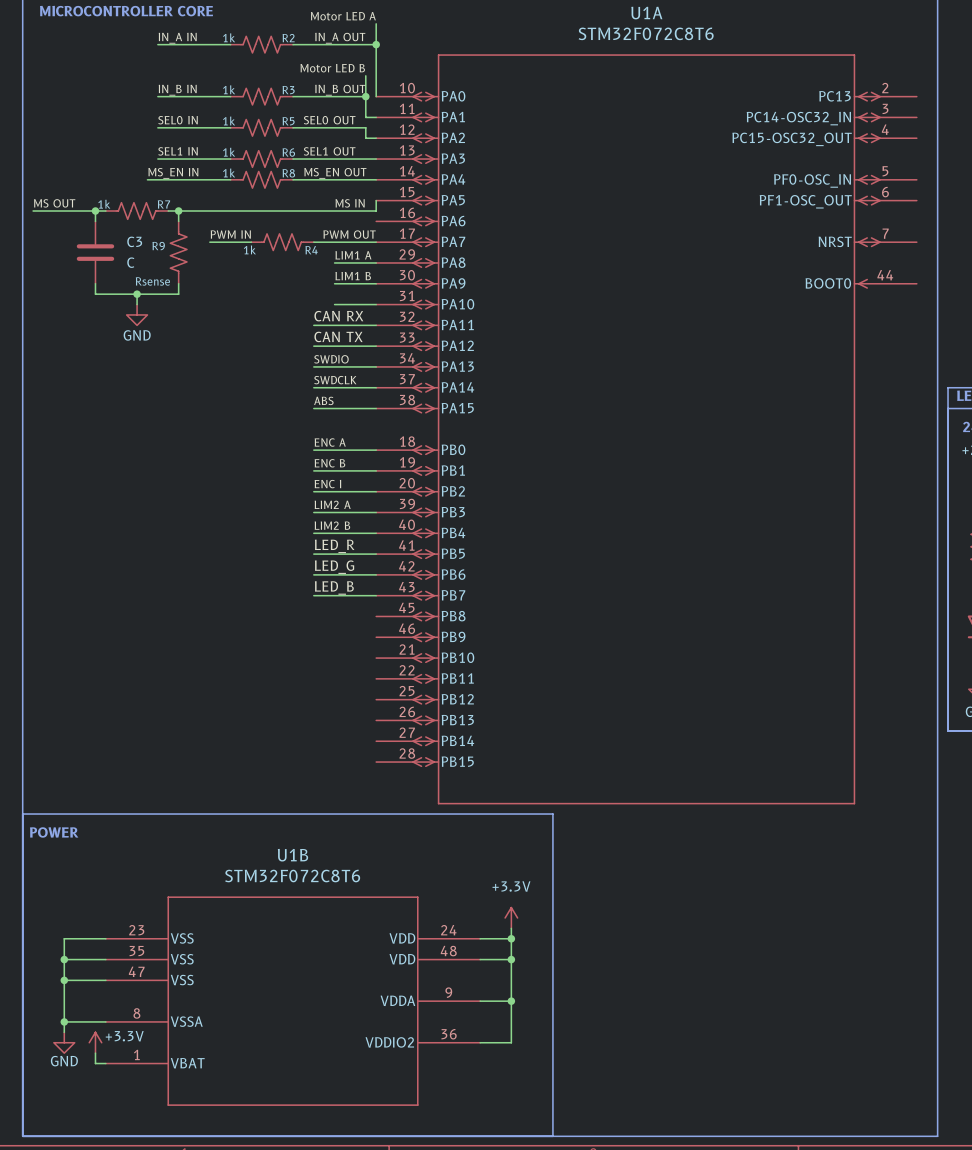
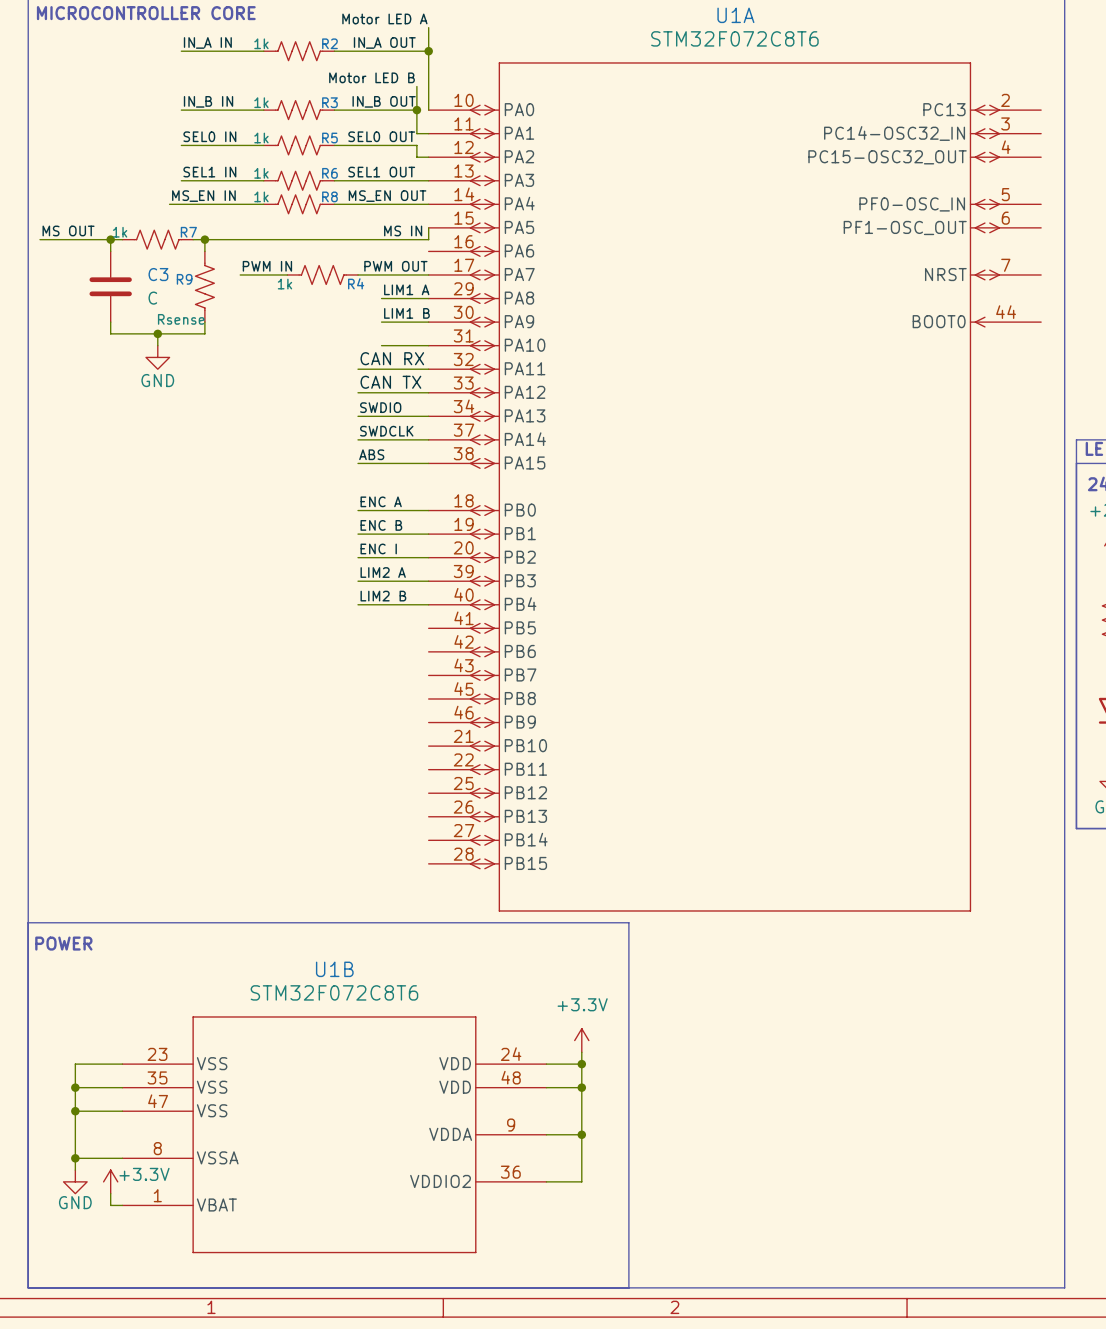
label: LED_R (334, 546) -> none
wire: (313, 554) (376, 554) -> none
label: LED_G (334, 567) -> none
wire: (313, 574) (376, 574) -> none
label: LED_B (334, 587) -> none
wire: (313, 595) (376, 595) -> none

